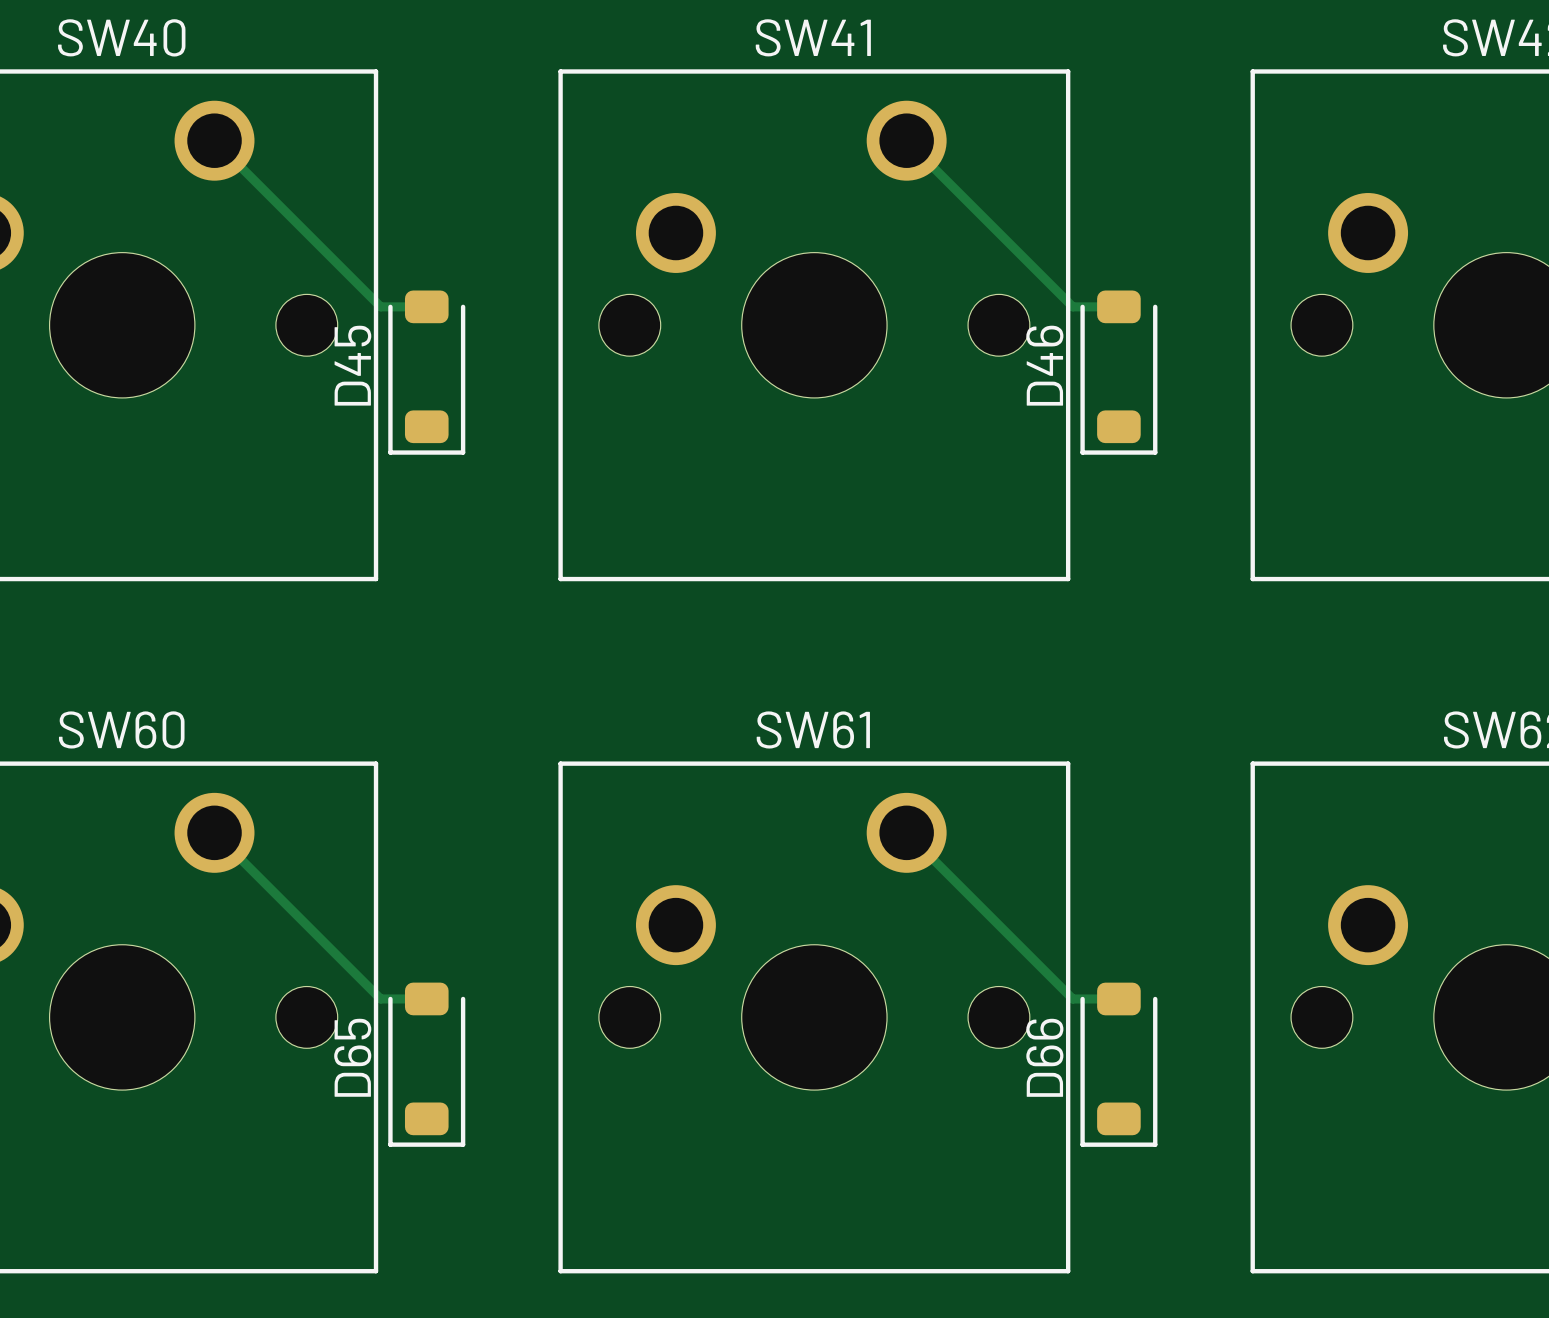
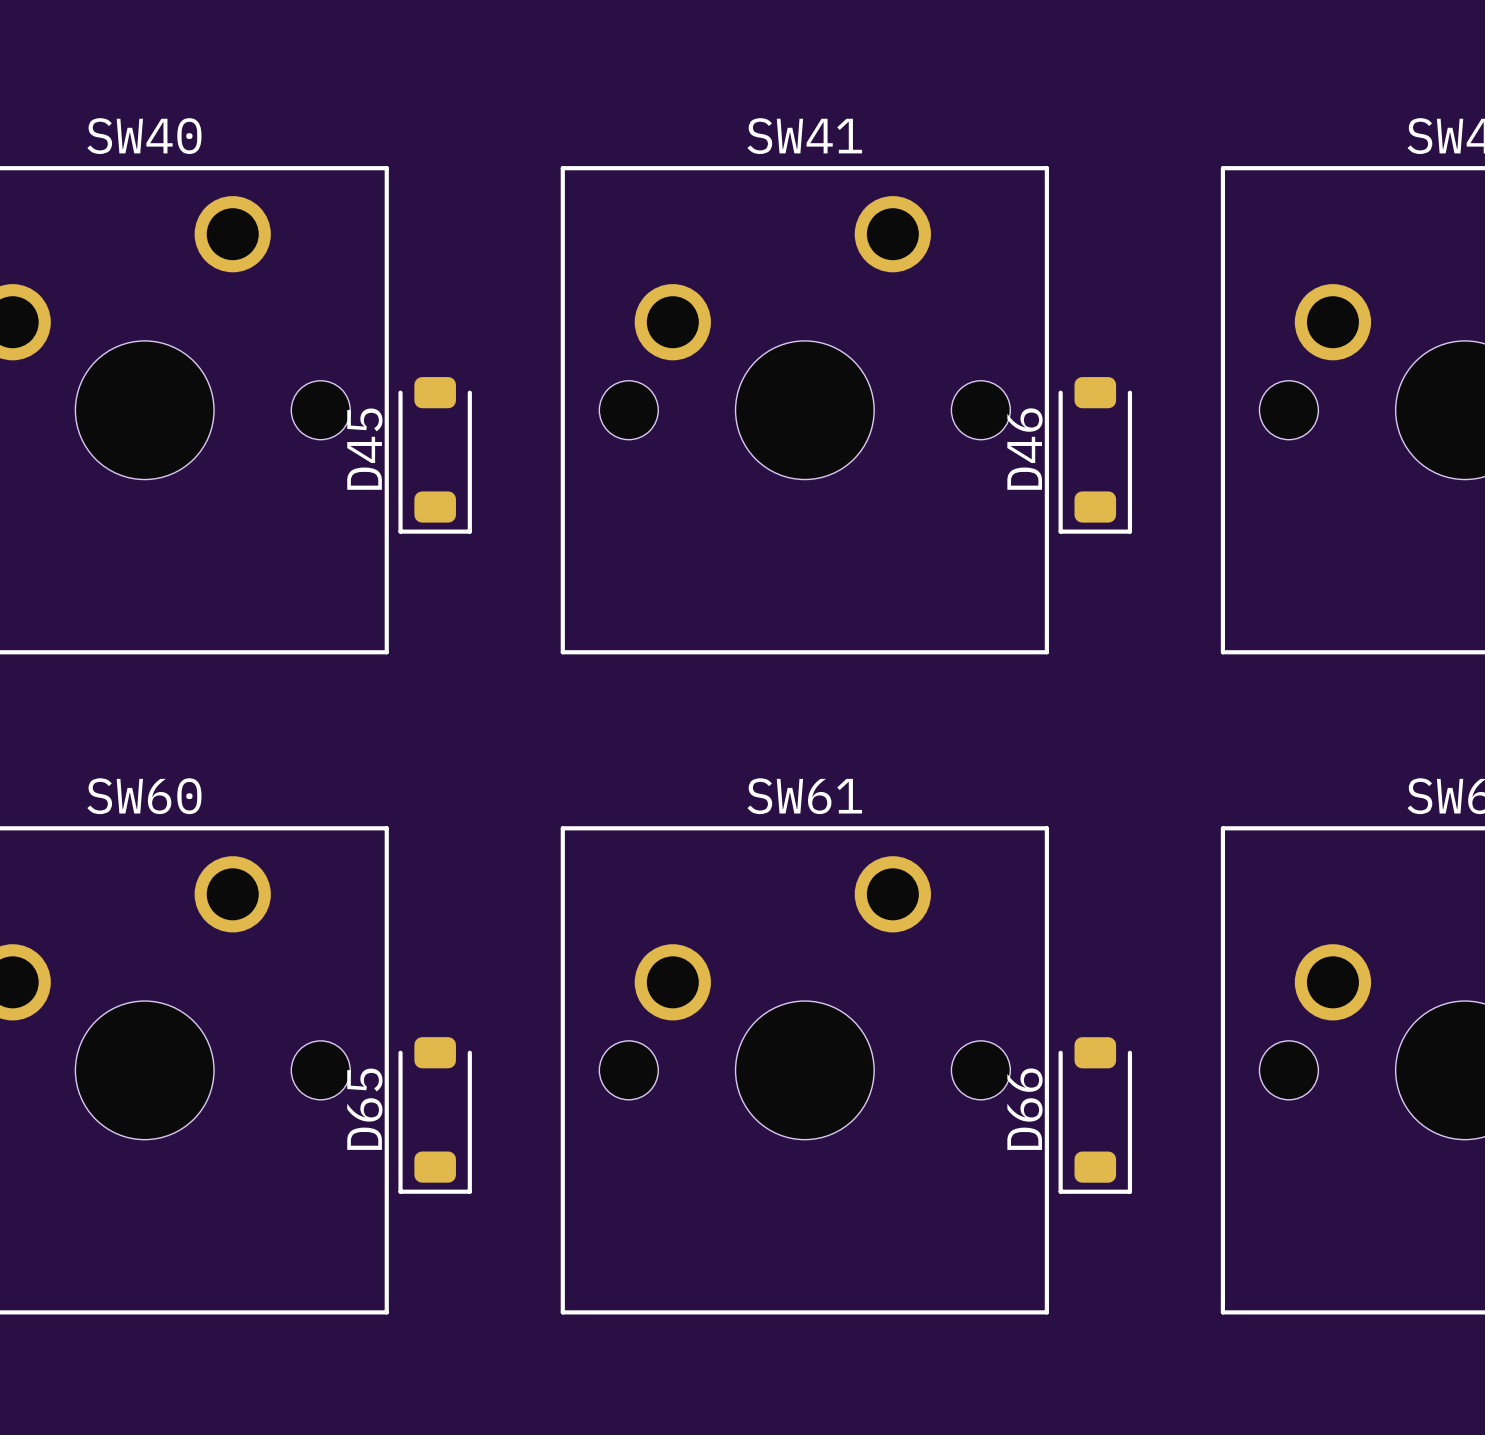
track: (214, 140) (380, 306) (426, 306) -> none
track: (906, 140) (1072, 306) (1118, 306) -> none
track: (214, 832) (380, 998) (426, 998) -> none
track: (906, 832) (1072, 998) (1118, 998) -> none

